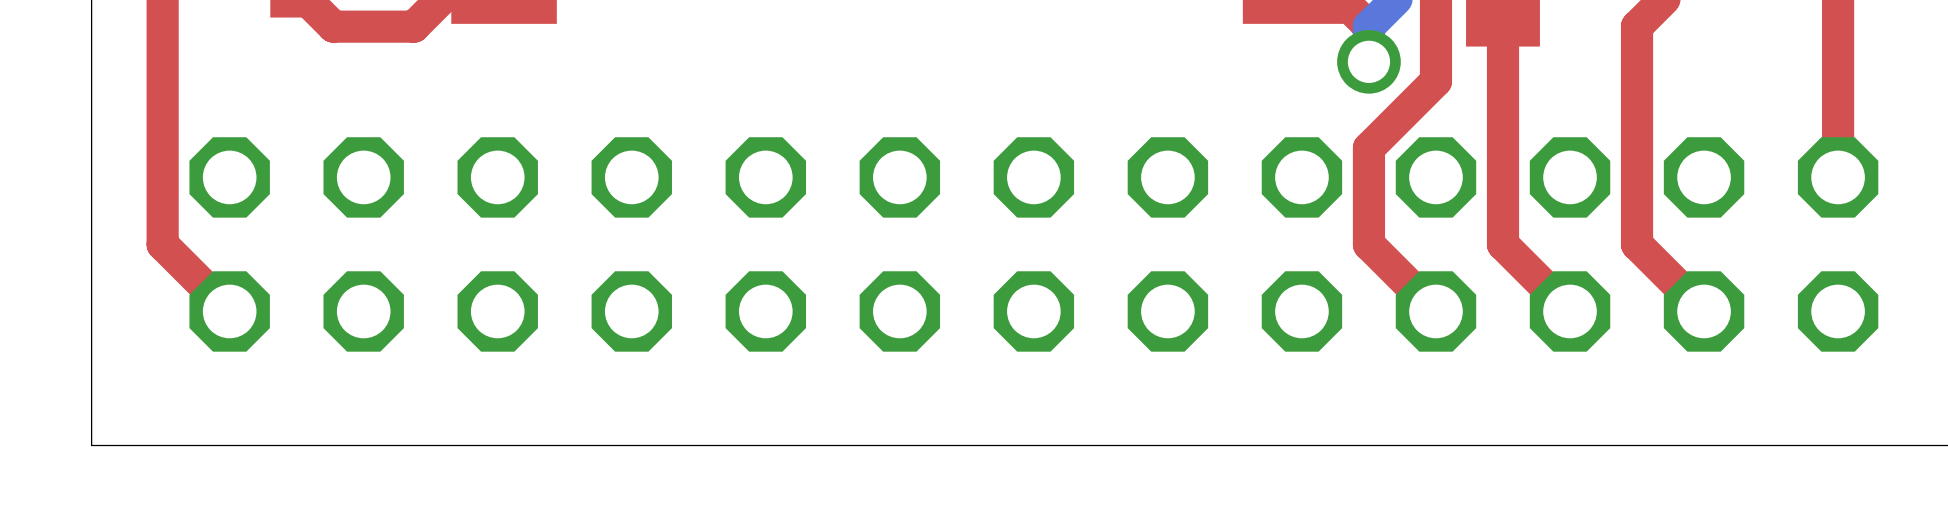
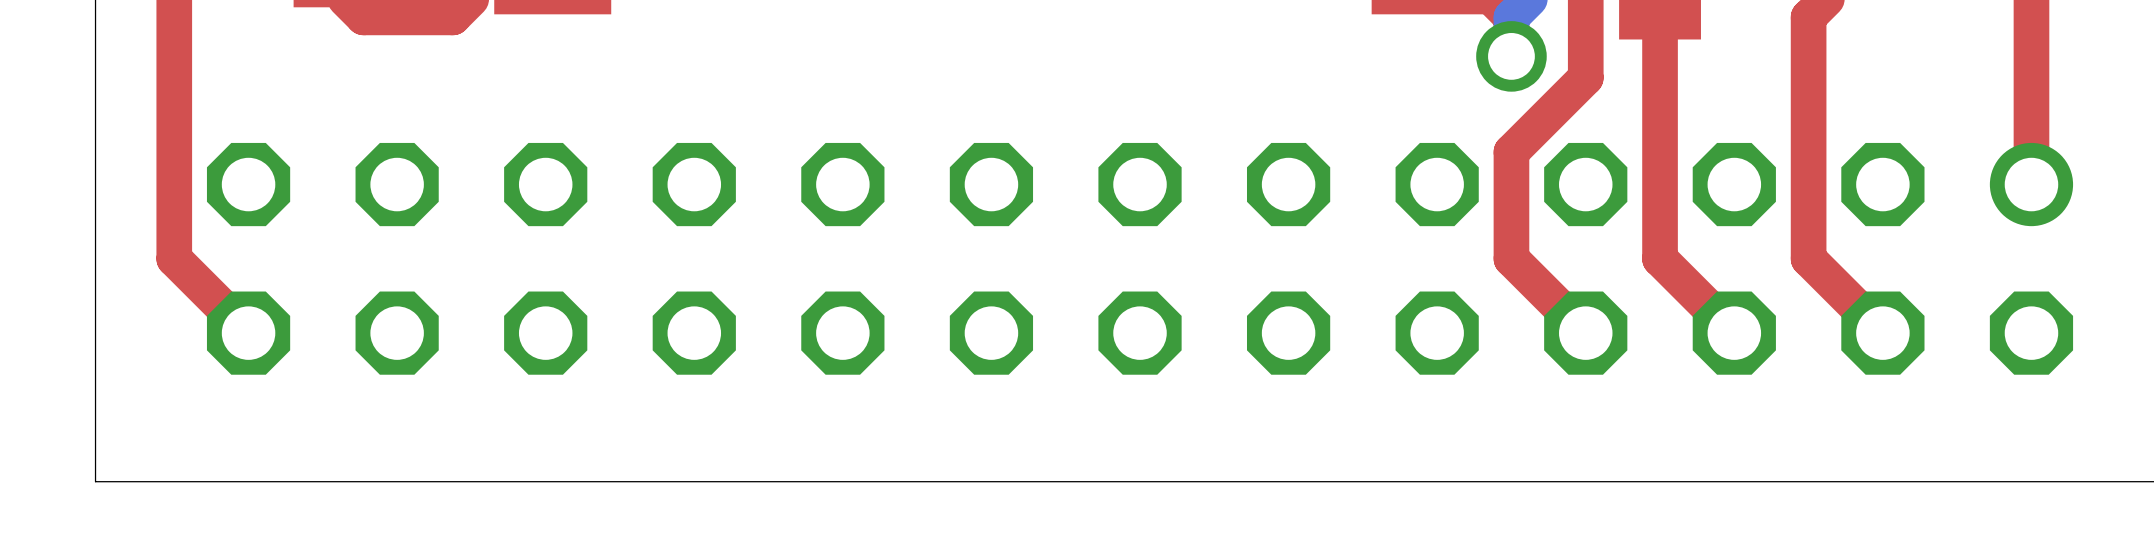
part footprint: [189, 137, 1879, 352] -> [206, 142, 2074, 375]

